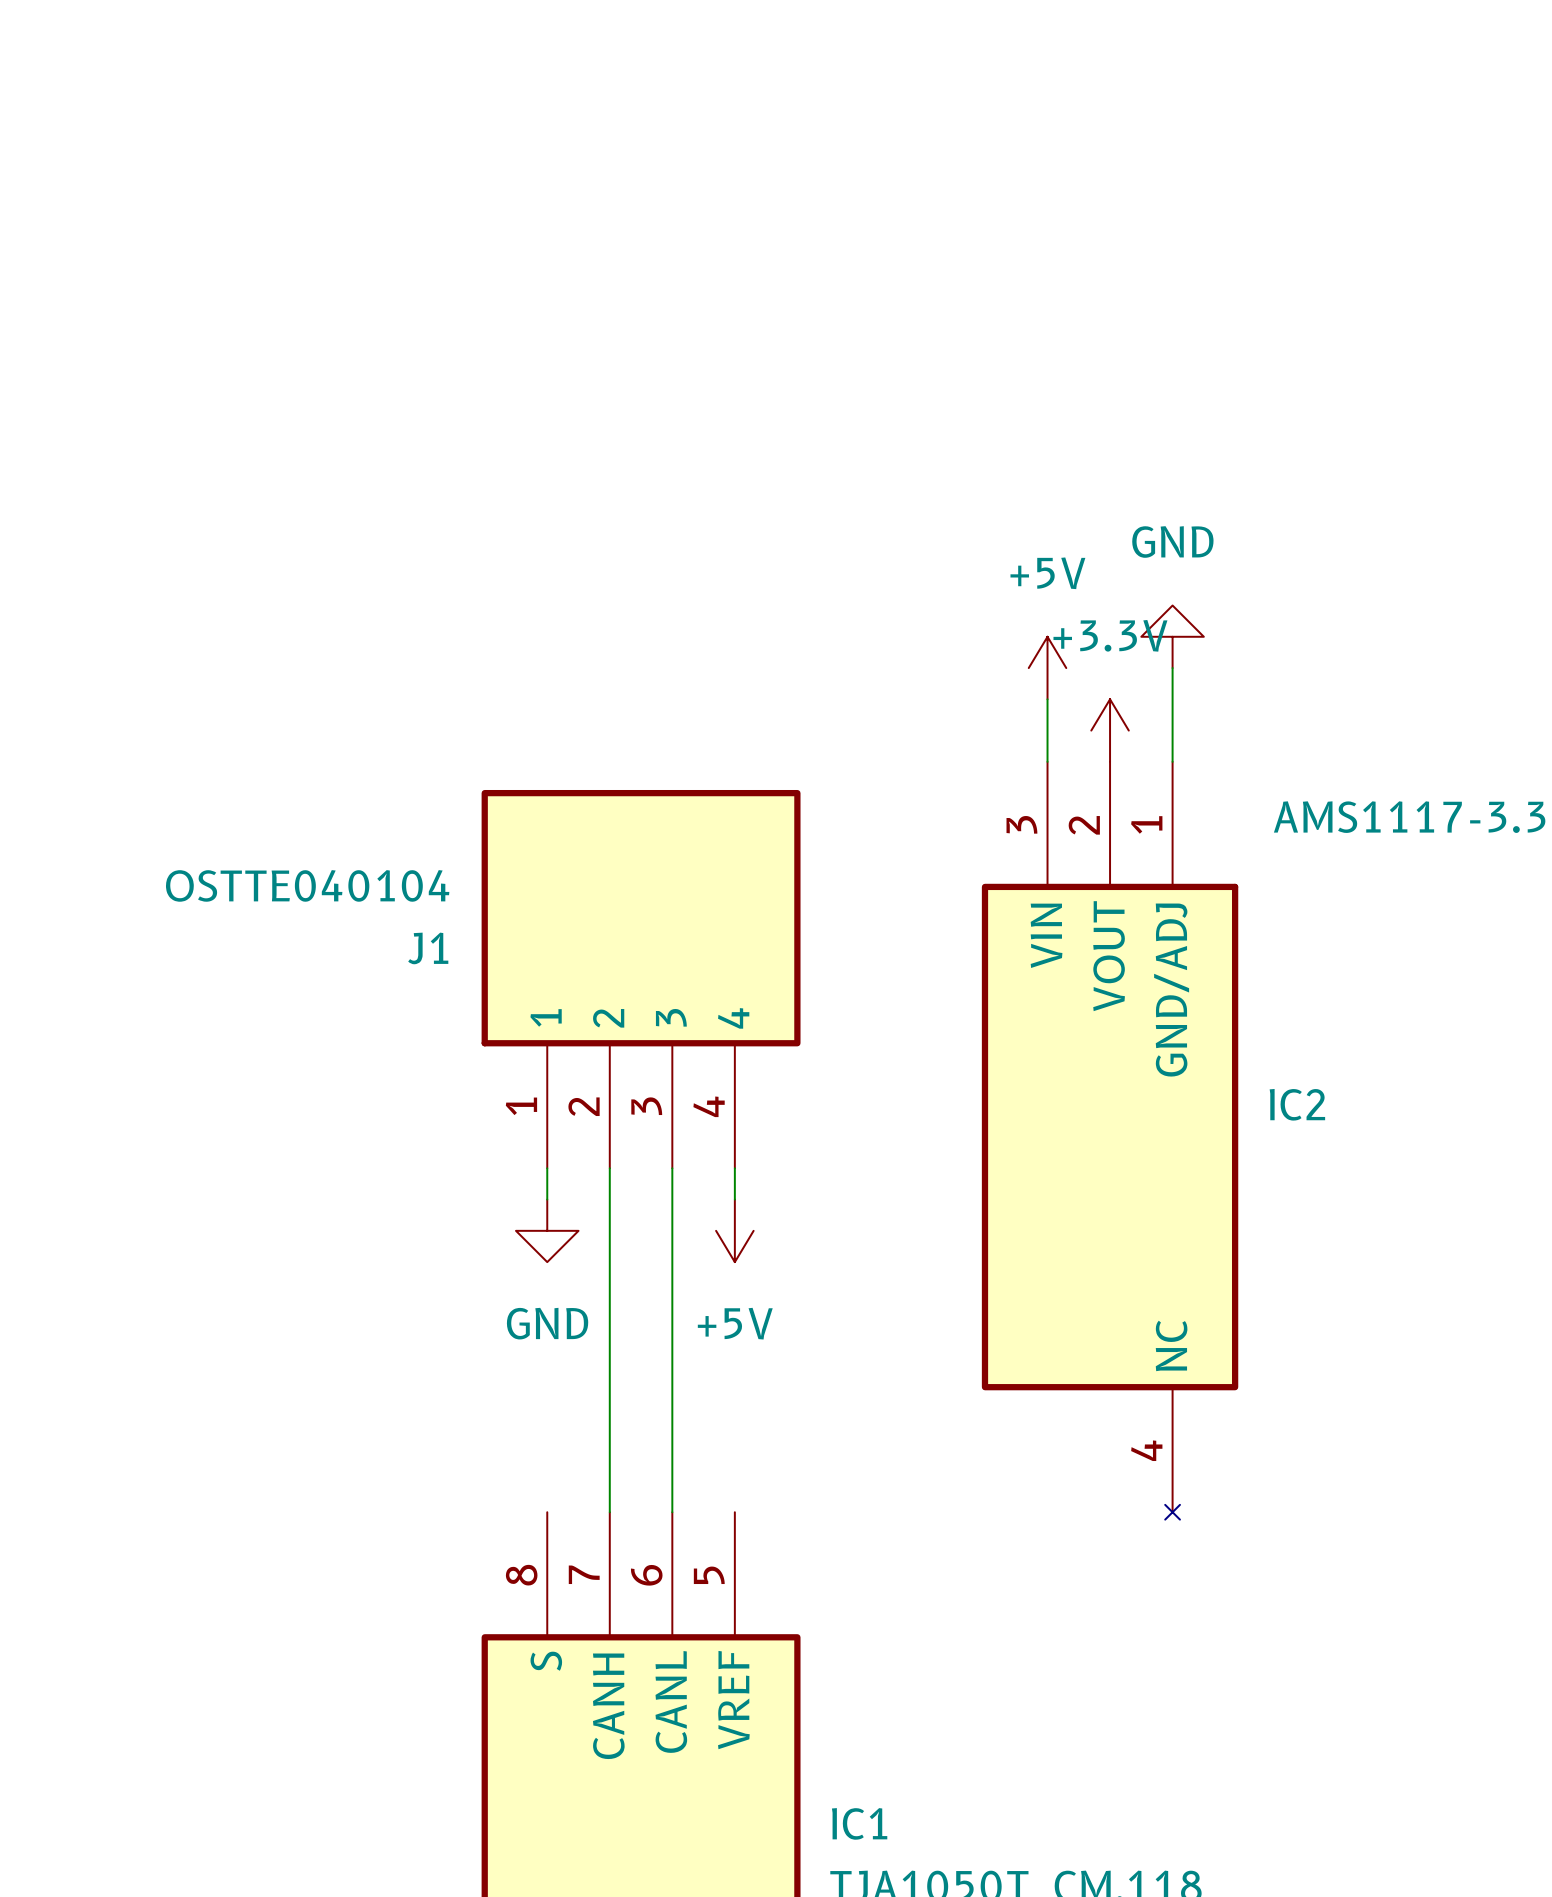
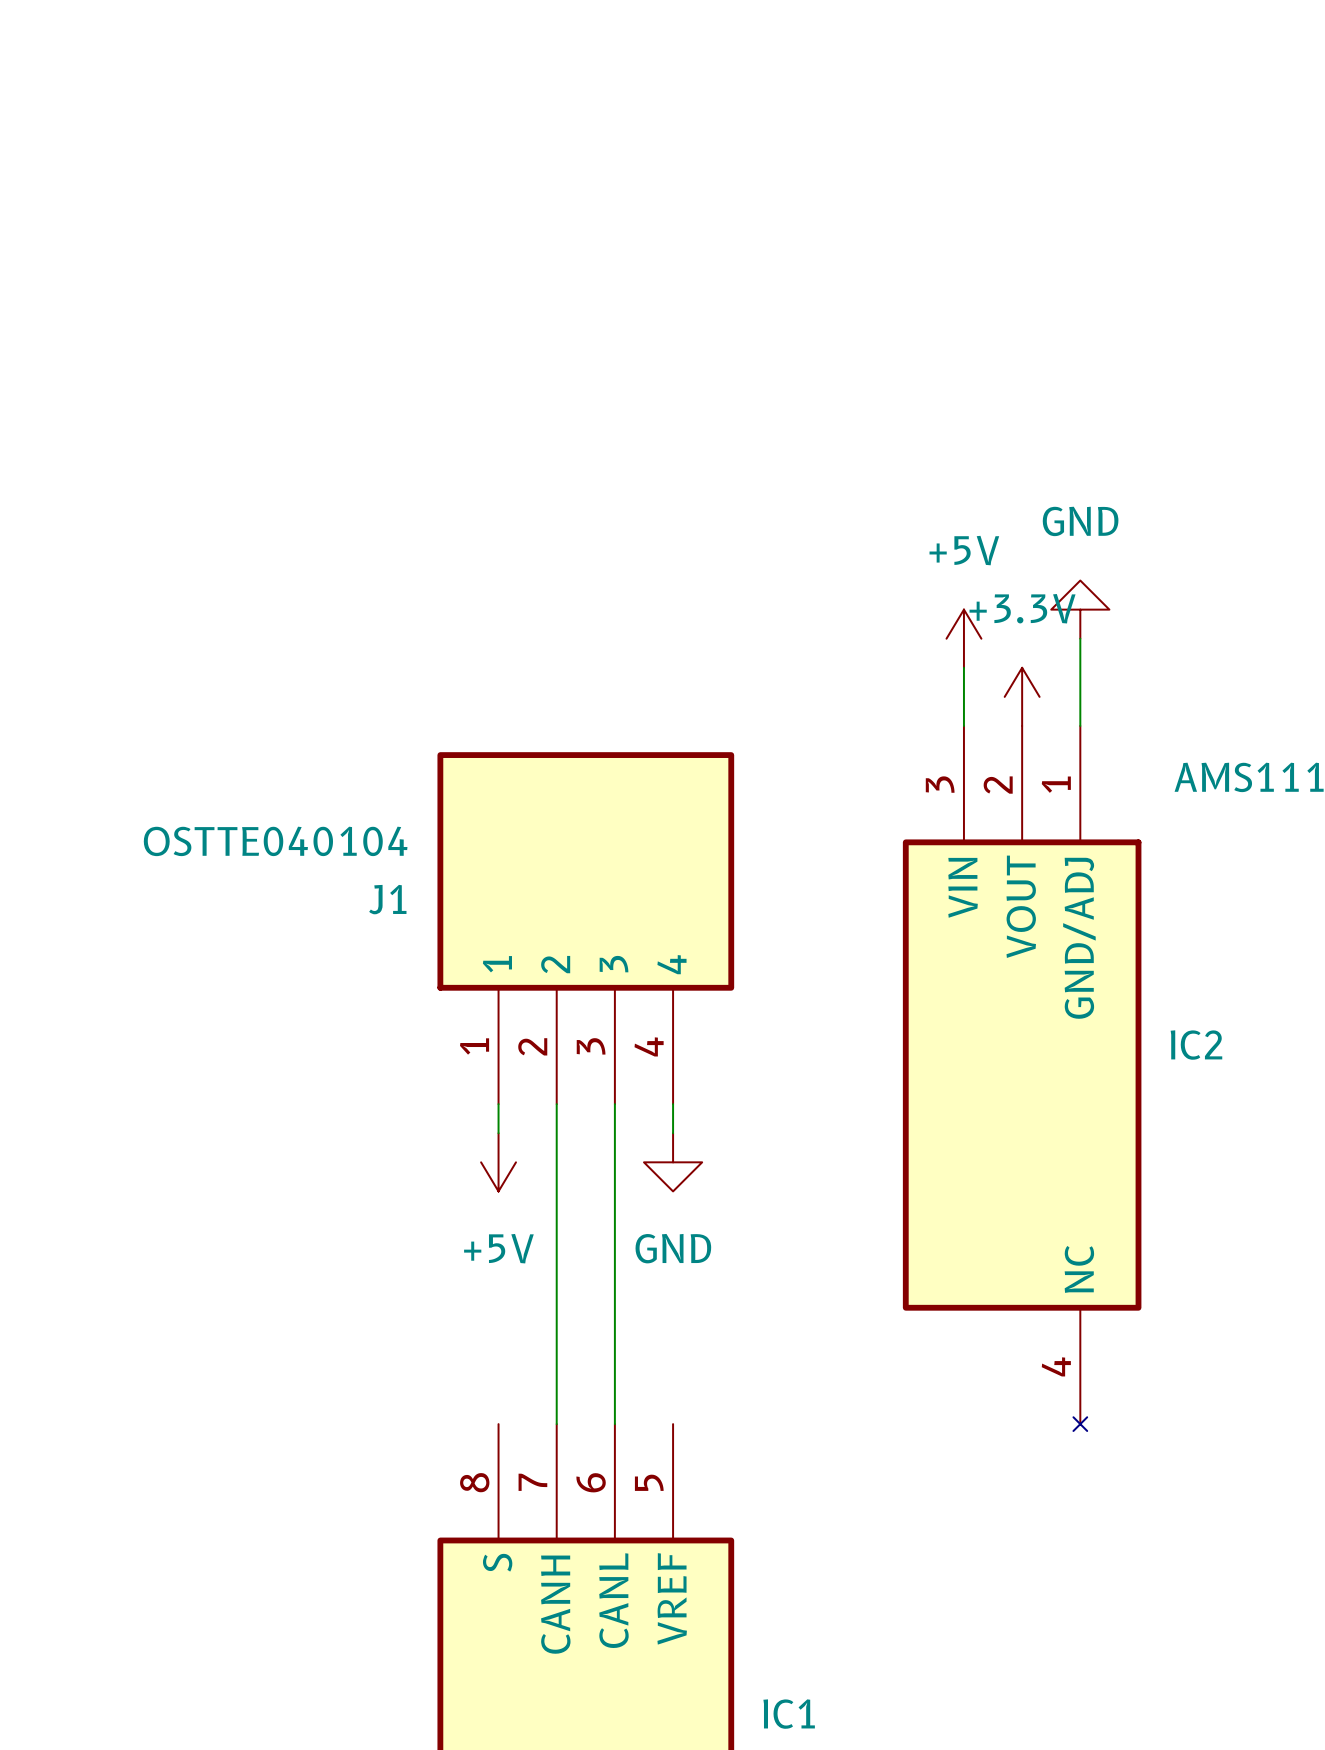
power symbol: GND (547, 1230) -> +5V (498, 1162)
power symbol: +5V (734, 1230) -> GND (673, 1162)

